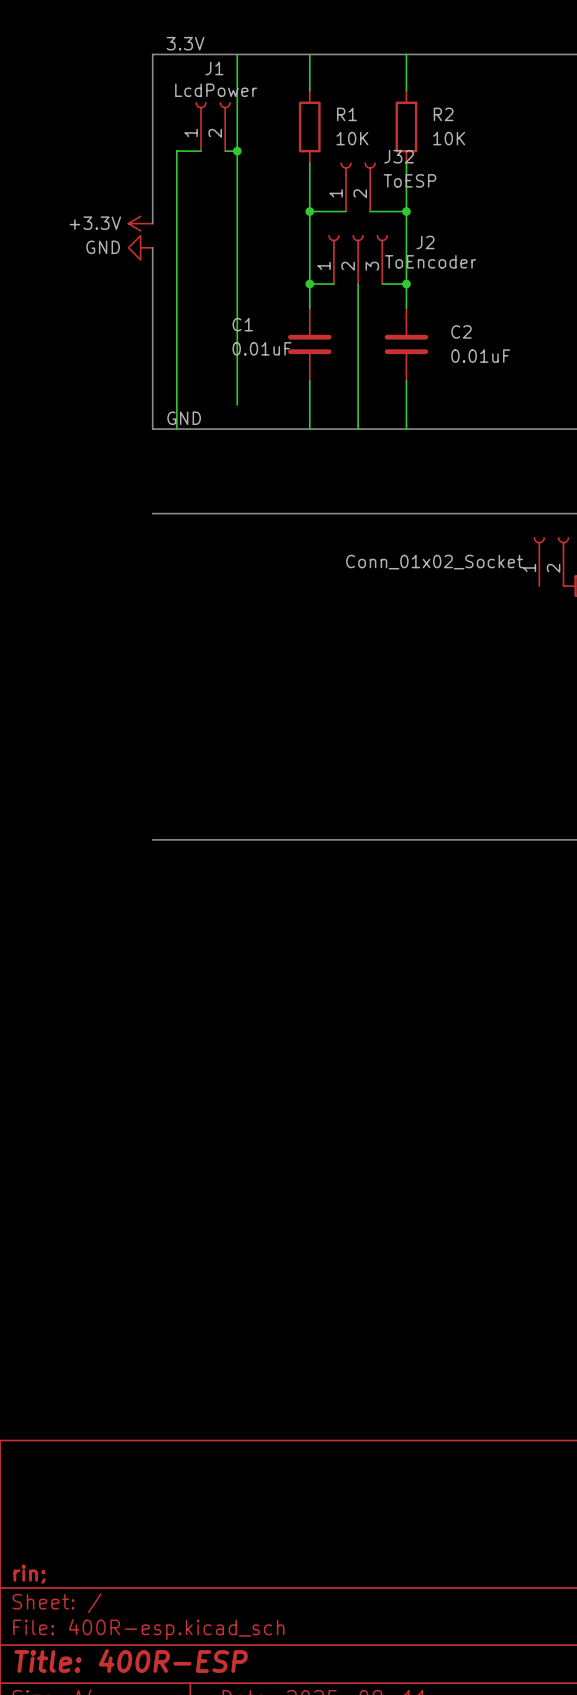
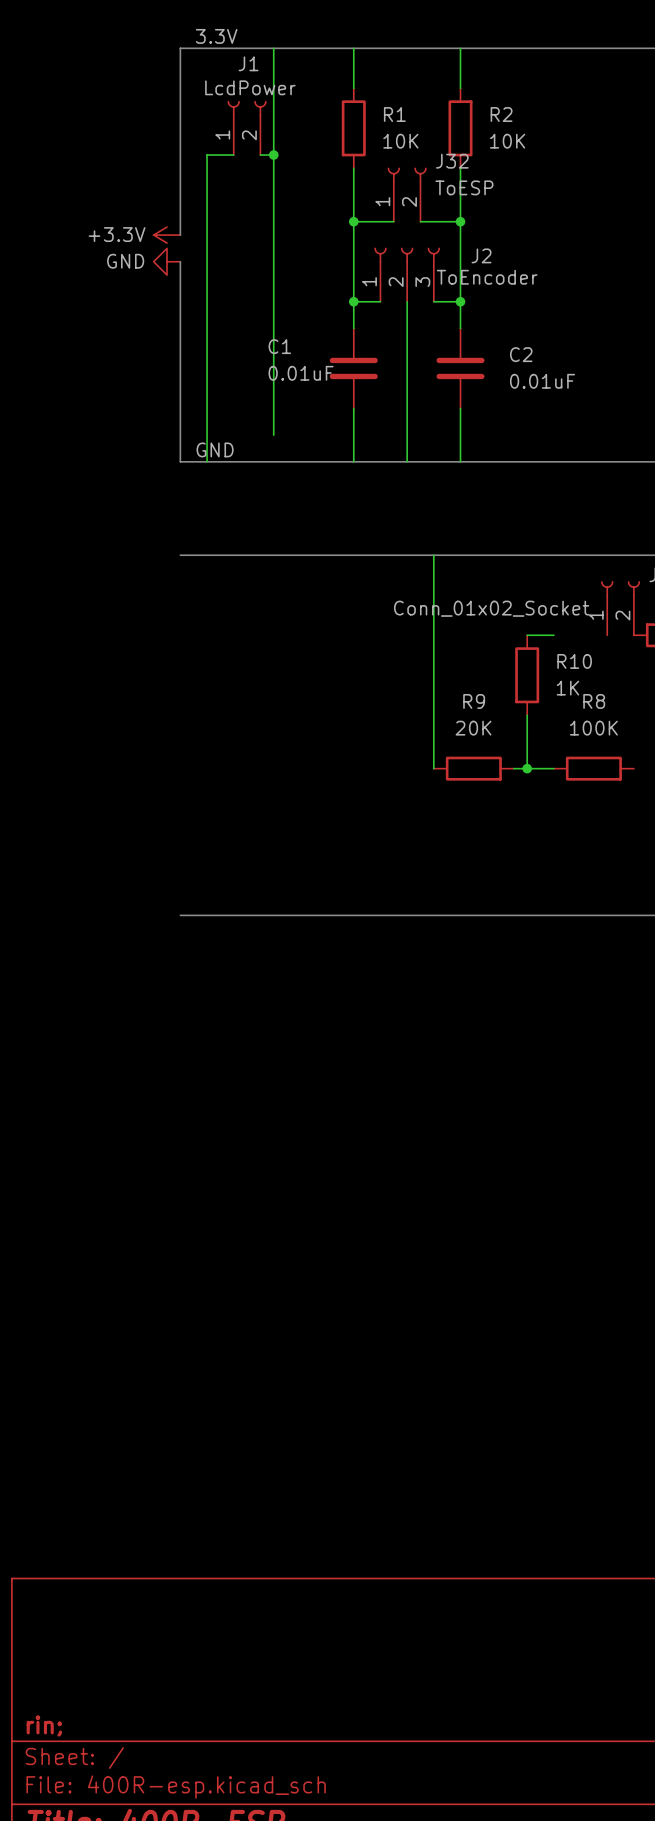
wire: none -> (433, 555) (433, 768)
wire: none -> (527, 635) (553, 635)
R10: none -> 1K (527, 675)
wire: none -> (527, 715) (527, 768)
R9: none -> 20K (473, 768)
wire: none -> (513, 768) (553, 768)
junction: none -> (527, 768)
R8: none -> 100K (593, 768)

